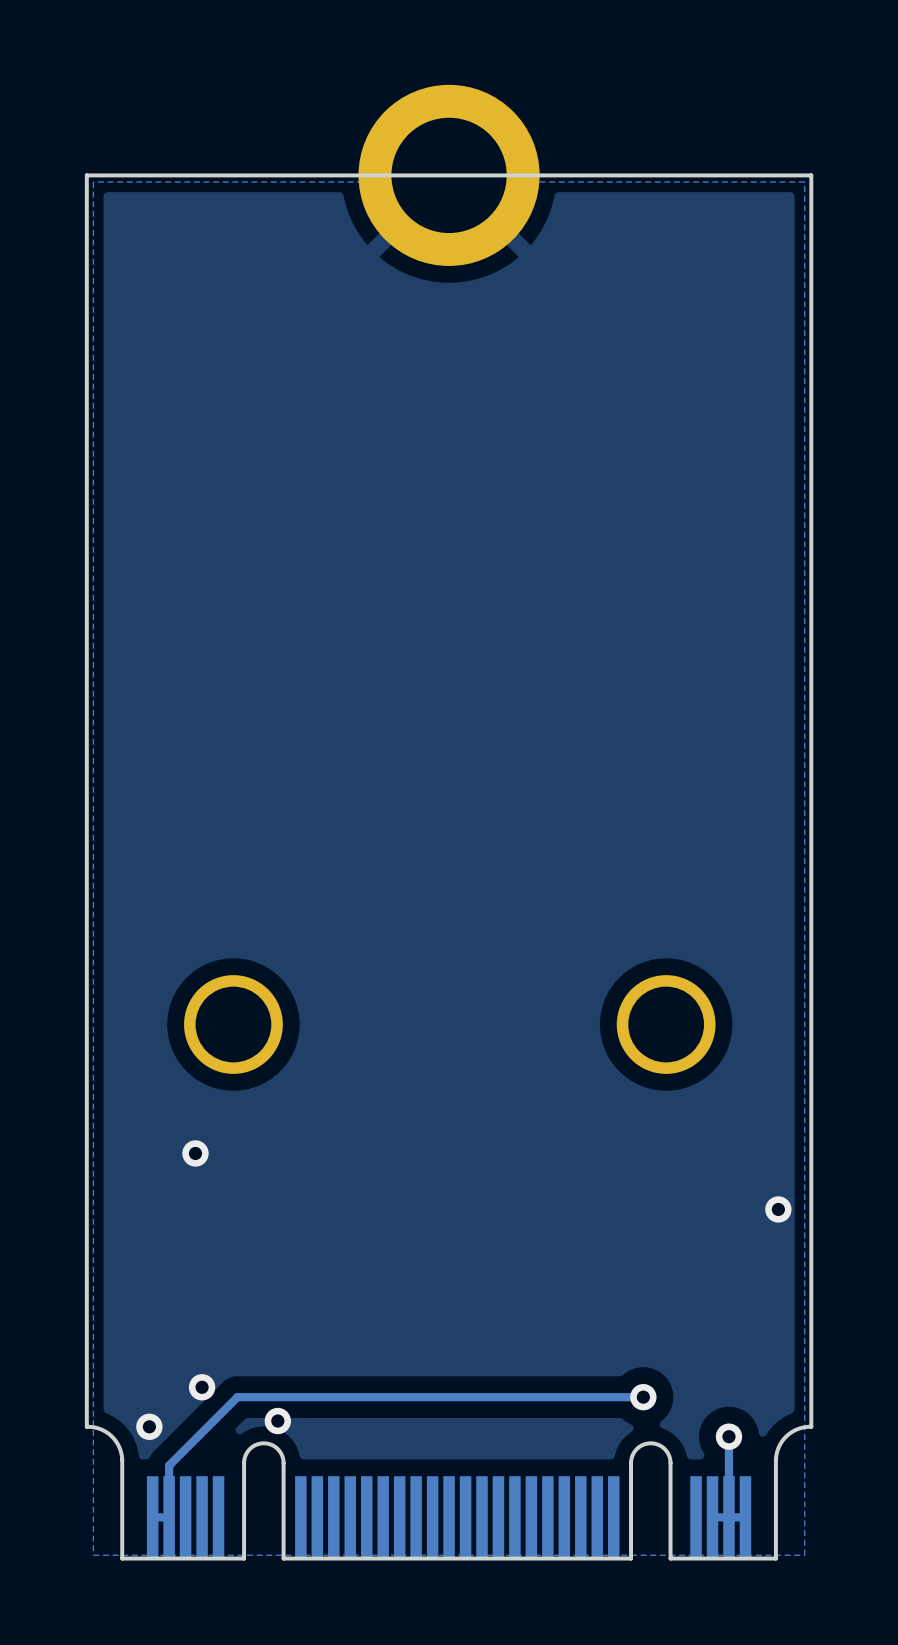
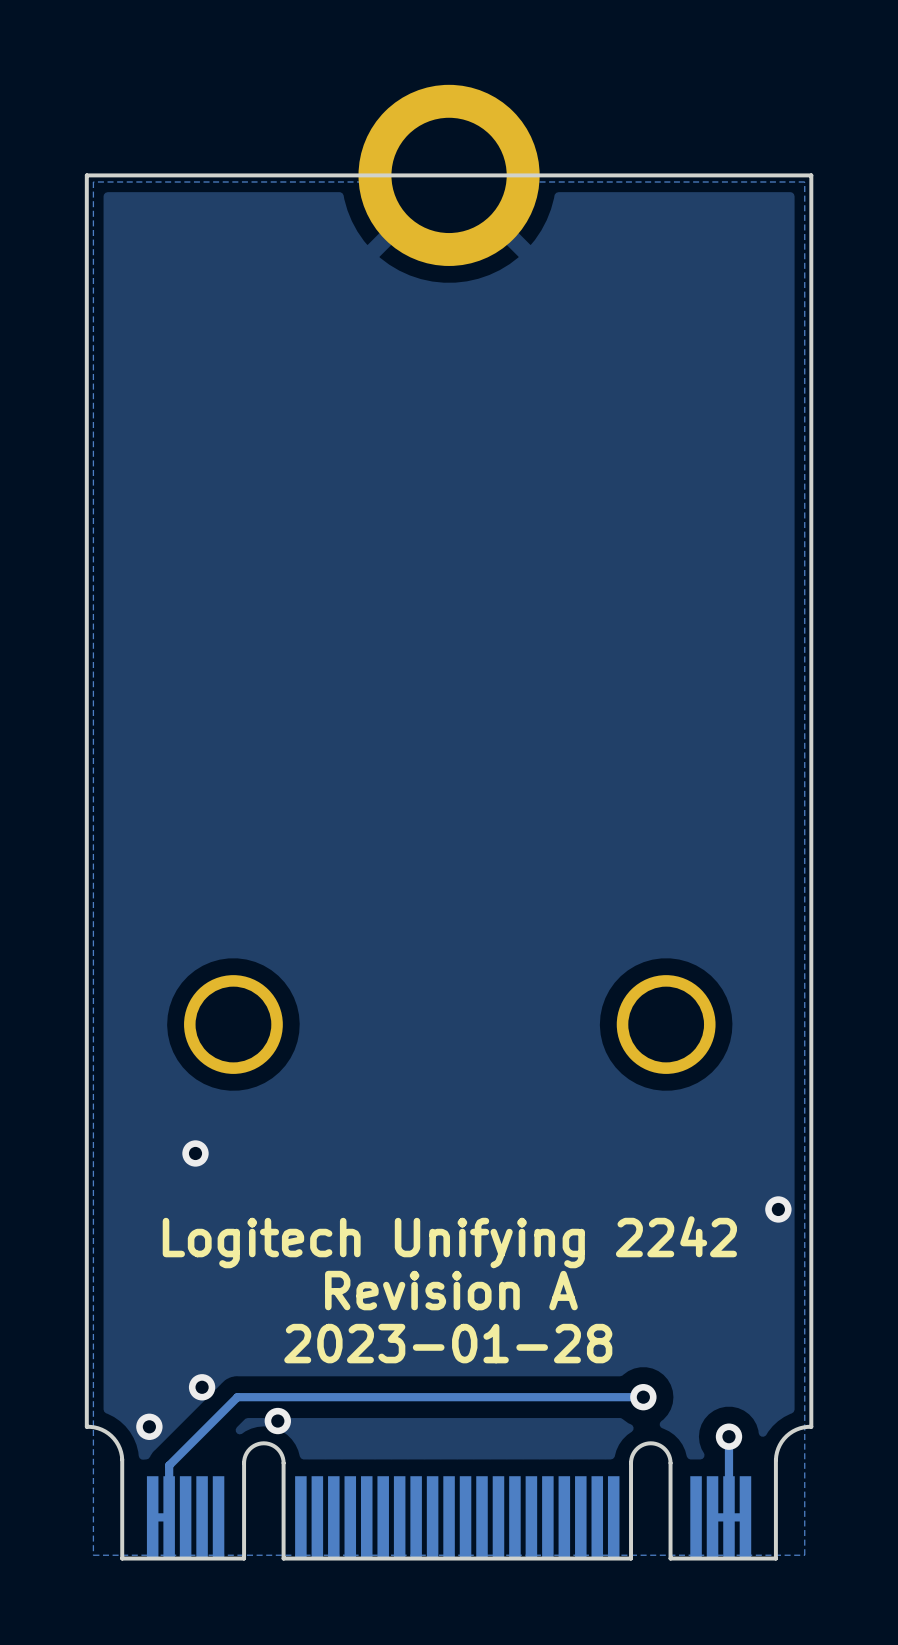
text: none -> Logitech Unifying 2242 (449, 1242)
text: none -> Revision A (451, 1290)
text: none -> 2023-01-28 (448, 1343)

